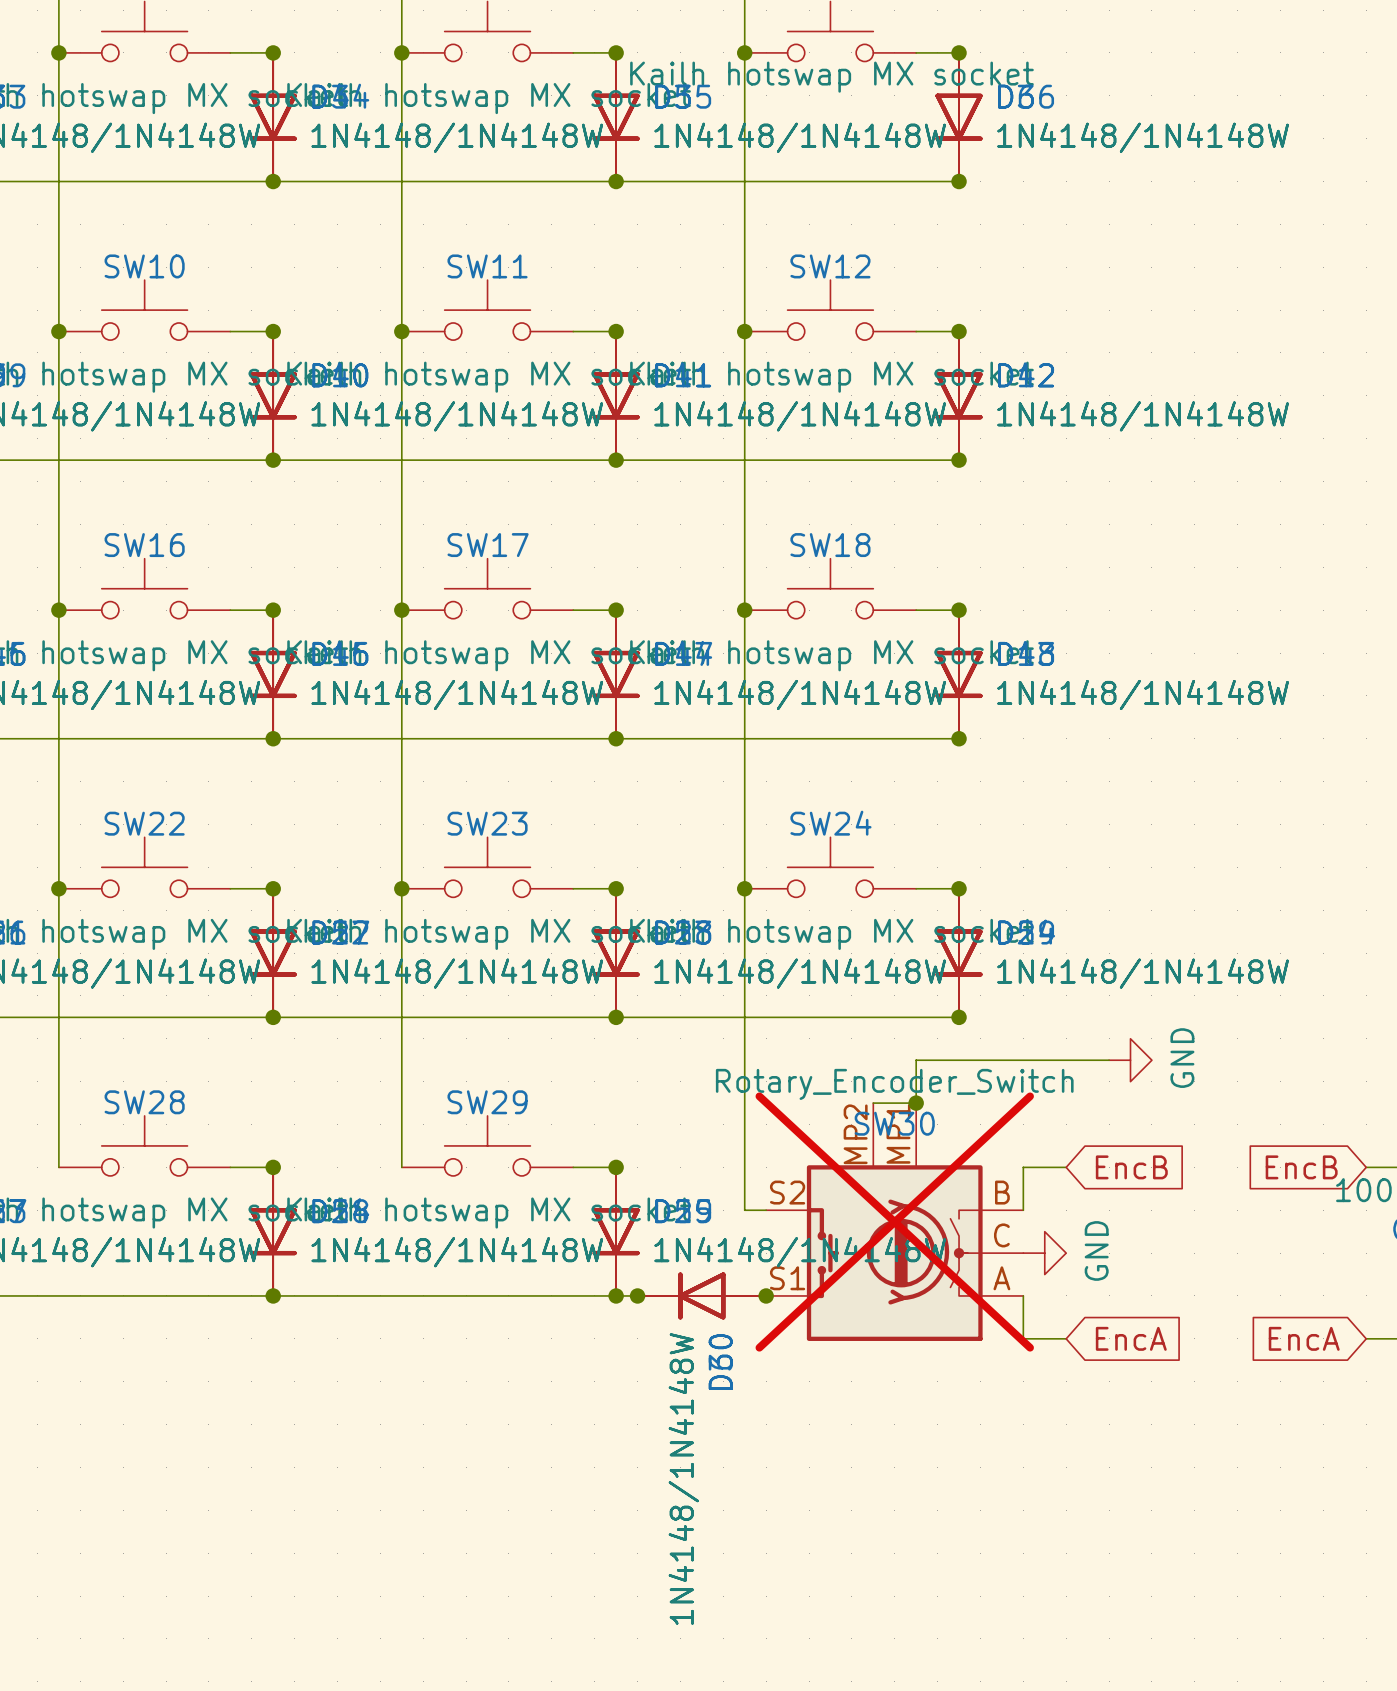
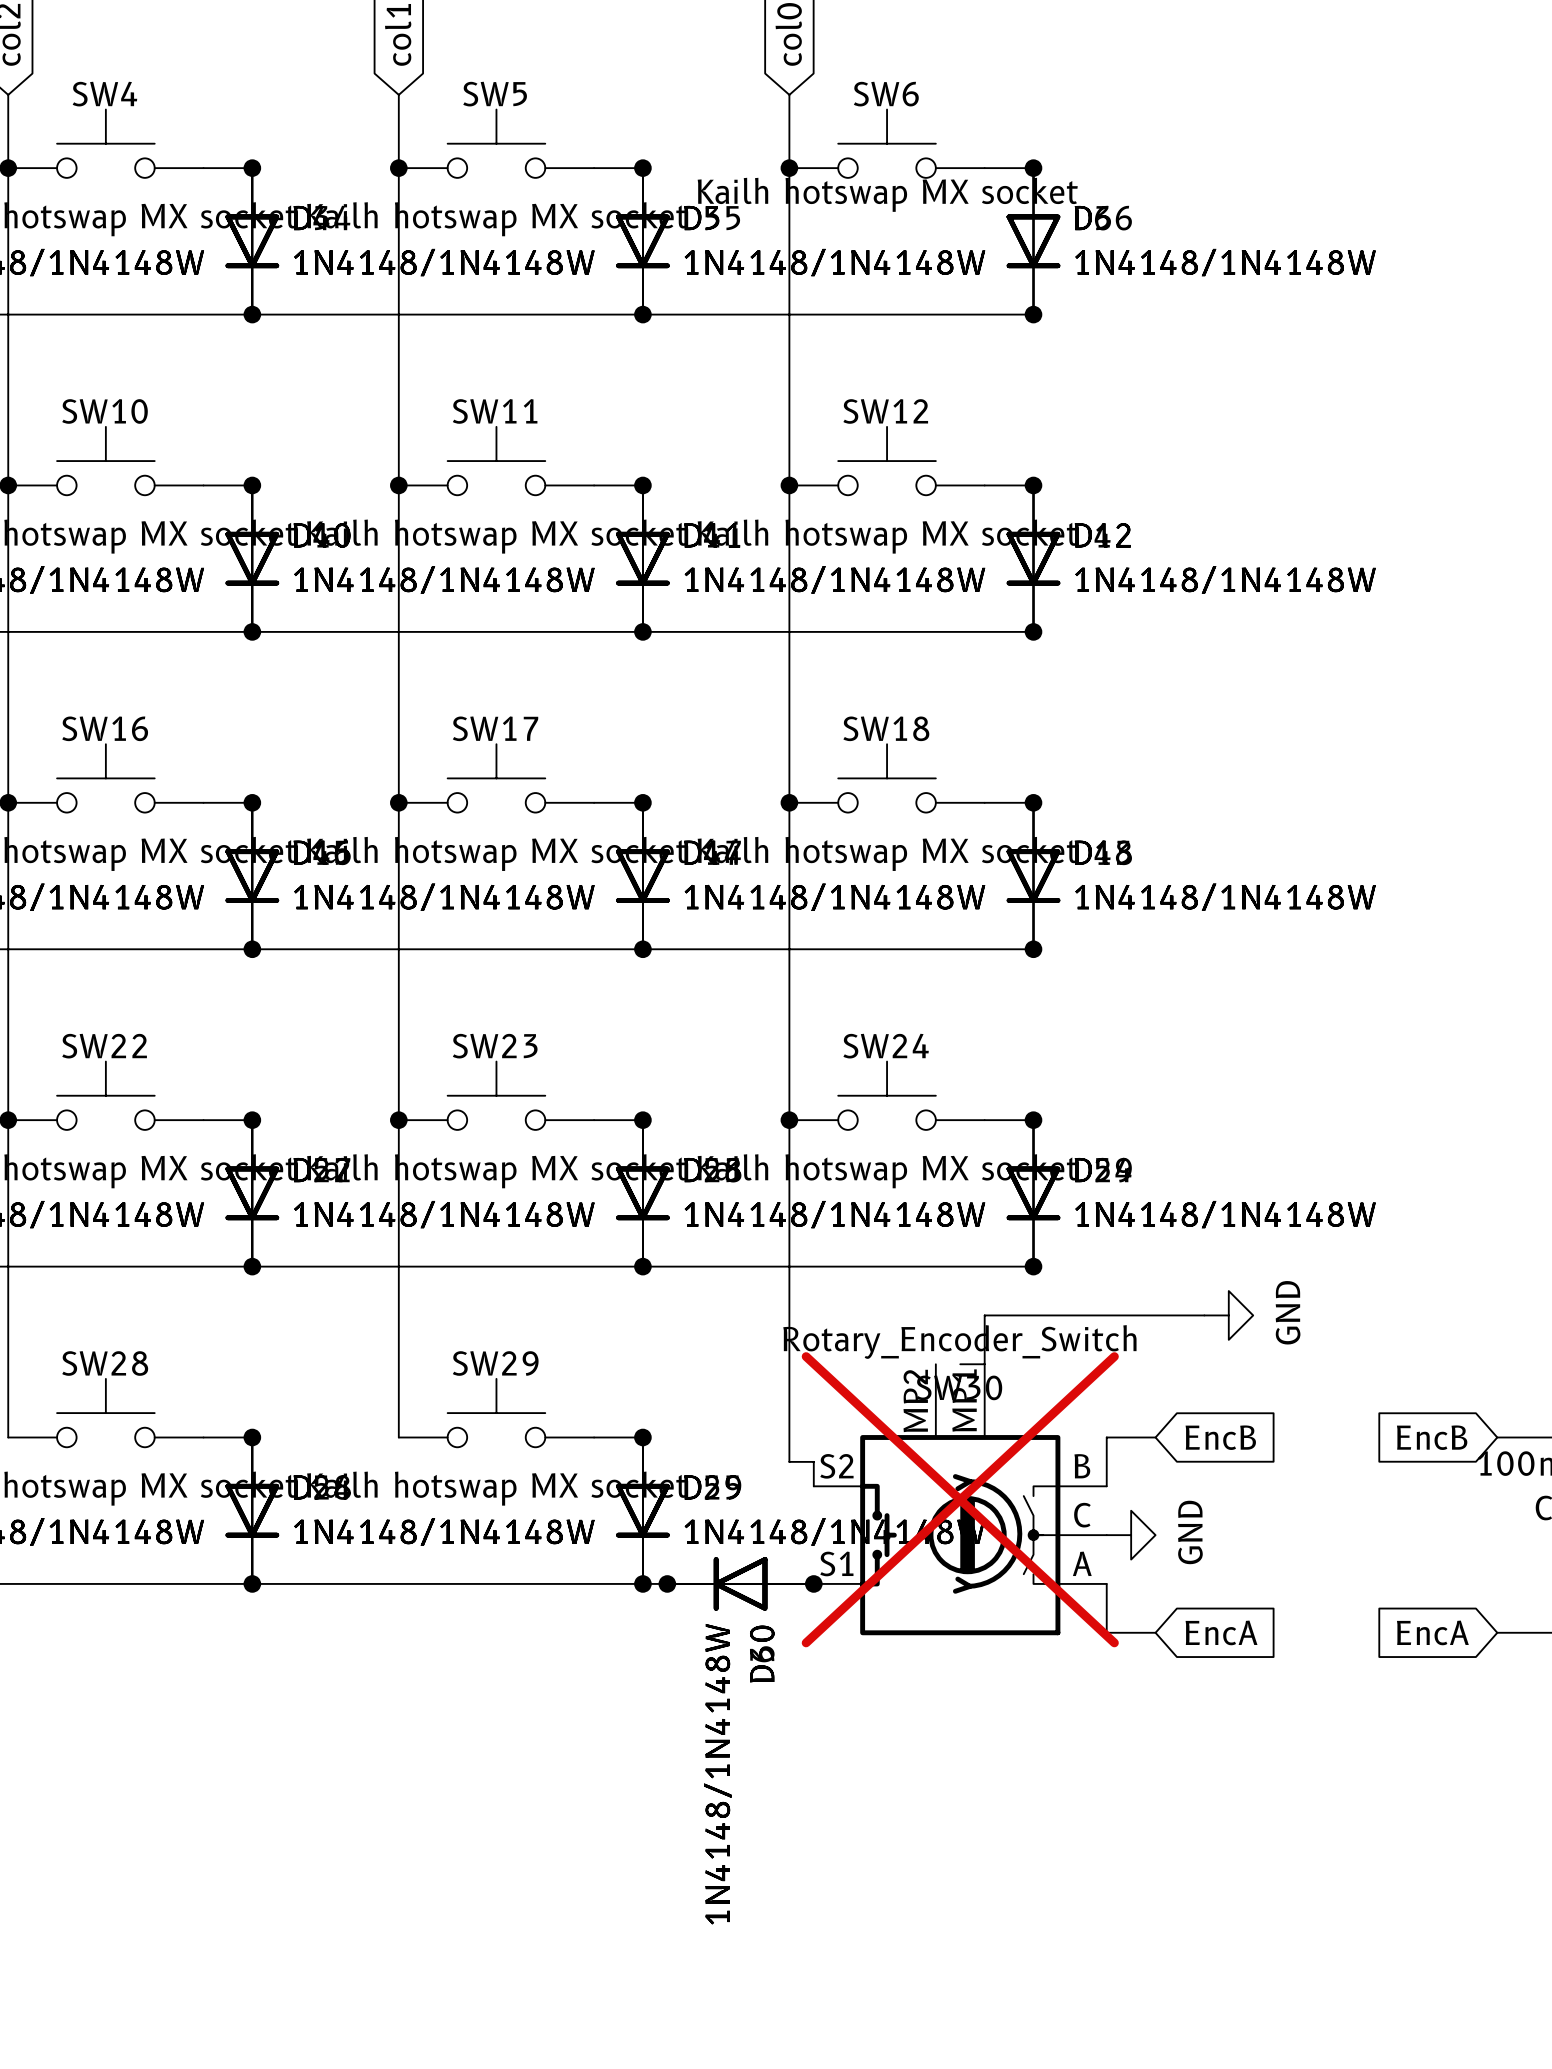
wire: (873, 1103) (894, 1103) -> none
junction: (916, 1103) -> none
wire: (744, 1188) (744, 1210) (766, 1210) -> (789, 1461) (813, 1461) (813, 1486)

